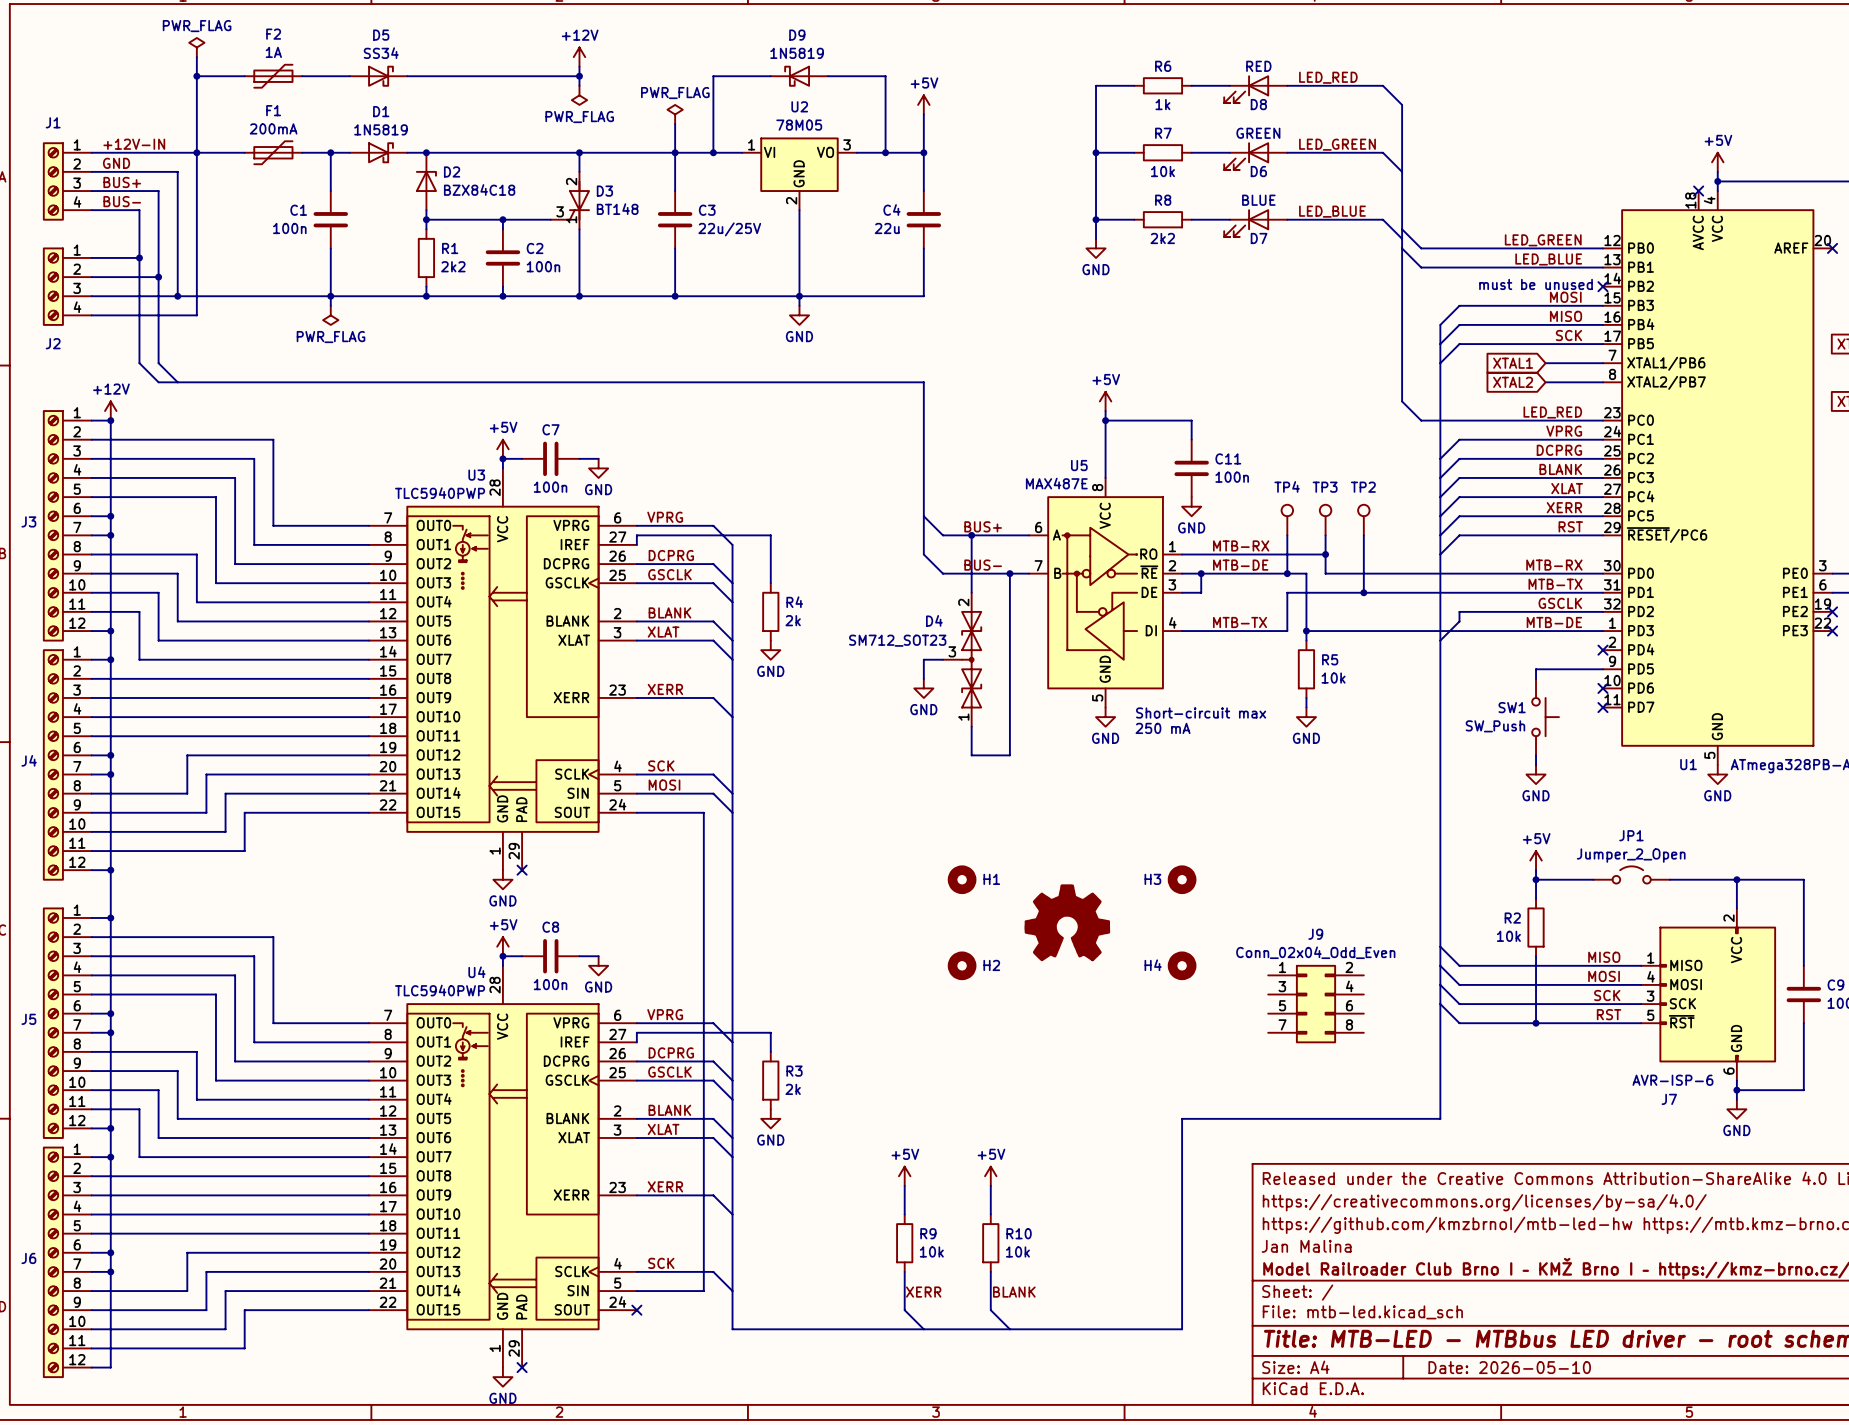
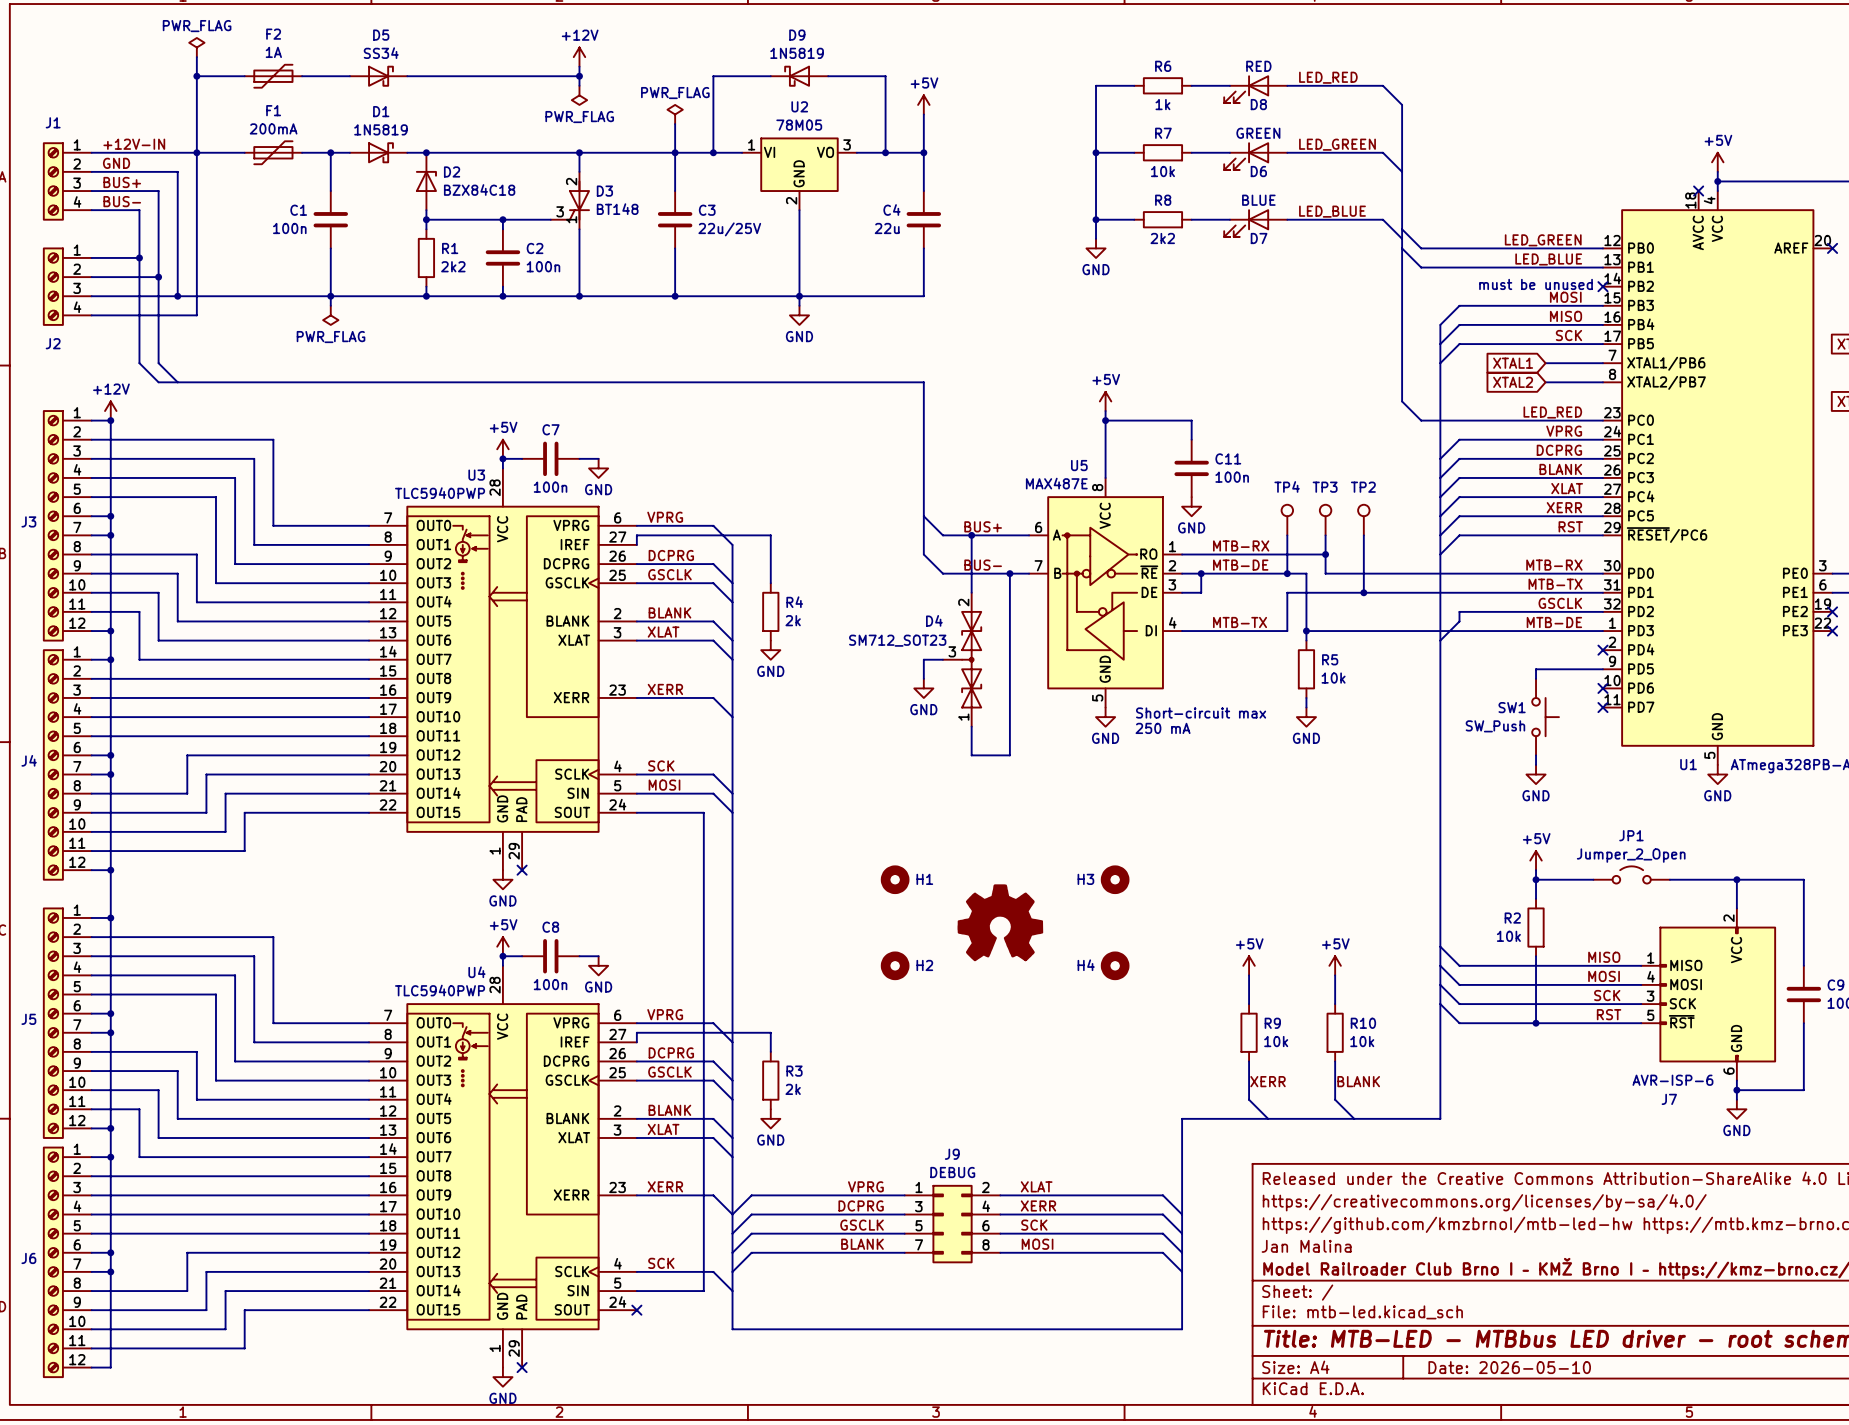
H1 position: (962, 879) -> (895, 879)
H3 position: (1182, 879) -> (1115, 879)
power symbol position: (1067, 922) -> (1000, 922)
J9 value: Conn_02x04_Odd_Even (1315, 952) -> DEBUG (952, 1172)
H2 position: (962, 965) -> (895, 965)
H4 position: (1182, 965) -> (1115, 965)
power symbol: none -> +5V (1249, 965)
power symbol: none -> +5V (1335, 965)
wire: none -> (1249, 975) (1249, 1004)
J9 position: (1316, 1004) -> (952, 1224)
wire: none -> (1249, 1061) (1249, 1099) (1268, 1118)
wire: none -> (1335, 1061) (1335, 1099) (1354, 1118)
label: none -> XERR (1268, 1081)
label: none -> BLANK (1358, 1081)
power symbol: +5V (904, 1176) -> none
power symbol: +5V (990, 1176) -> none
wire: (904, 1185) (904, 1214) -> (732, 1233) (751, 1214) (904, 1214)
wire: (990, 1185) (990, 1214) -> none
label: none -> VPRG (865, 1186)
label: none -> XLAT (1036, 1186)
wire: none -> (904, 1195) (751, 1195) (732, 1214)
wire: none -> (1000, 1195) (1162, 1195) (1182, 1214)
label: none -> DCPRG (861, 1205)
wire: none -> (1000, 1214) (1162, 1214) (1182, 1233)
label: none -> GSCLK (862, 1225)
label: none -> SCK (1034, 1225)
wire: none -> (904, 1233) (751, 1233) (732, 1252)
wire: none -> (1000, 1233) (1162, 1233) (1182, 1252)
R9 position: (904, 1243) -> (1249, 1032)
R10 position: (990, 1243) -> (1335, 1032)
label: none -> MOSI (1037, 1244)
wire: none -> (904, 1252) (751, 1252) (732, 1271)
wire: none -> (1000, 1252) (1162, 1252) (1182, 1271)
wire: (904, 1271) (904, 1310) (923, 1329) -> none
wire: (990, 1271) (990, 1310) (1009, 1329) -> none
label position: XERR (923, 1292) -> XERR (1038, 1205)
label position: BLANK (1014, 1292) -> BLANK (862, 1244)

